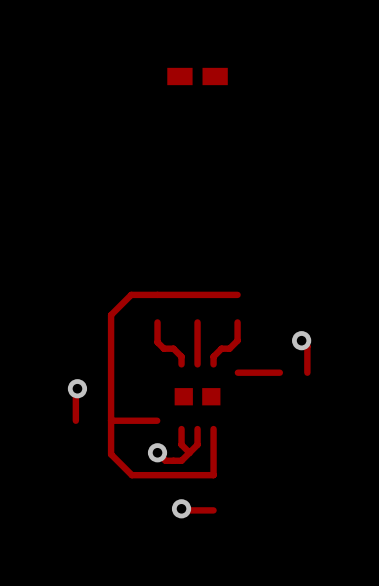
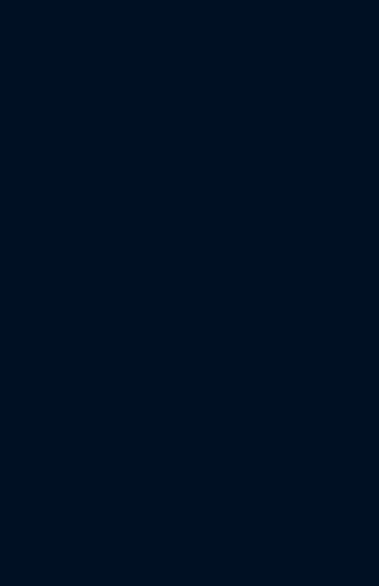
part: (197, 76) -> none
top track: (237, 294) (131, 294) (111, 315) (111, 454) (131, 475) (213, 475) (213, 429) -> none
top track: (157, 322) (157, 342) (163, 348) (173, 348) (181, 356) (181, 364) -> none
top track: (197, 322) (197, 364) -> none
top track: (237, 322) (237, 340) (229, 348) (221, 348) (213, 356) (213, 364) -> none
top track: (301, 340) (307, 346) (307, 372) -> none
via: (301, 340) -> none
top track: (279, 372) (237, 372) -> none
top track: (77, 388) (75, 390) (75, 420) -> none
via: (77, 388) -> none
part: (197, 396) -> none
top track: (157, 420) (111, 420) -> none
top track: (181, 429) (181, 444) (189, 452) -> none
top track: (197, 429) (197, 444) (181, 460) (165, 460) (157, 452) -> none
via: (157, 452) -> none
top track: (181, 508) (183, 510) (213, 510) -> none
via: (181, 508) -> none

